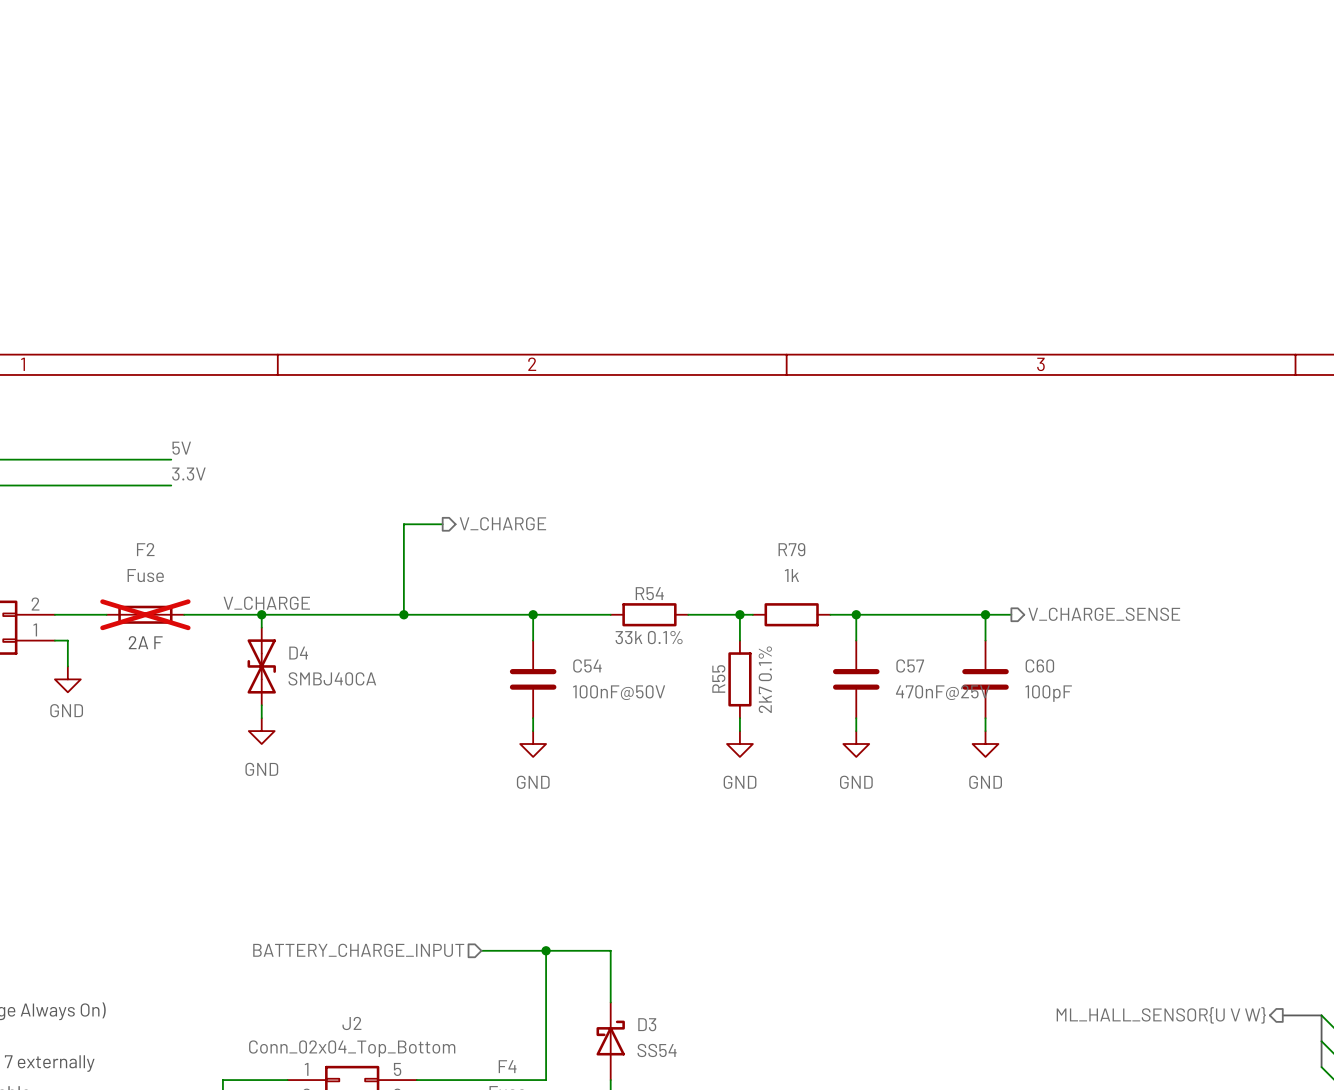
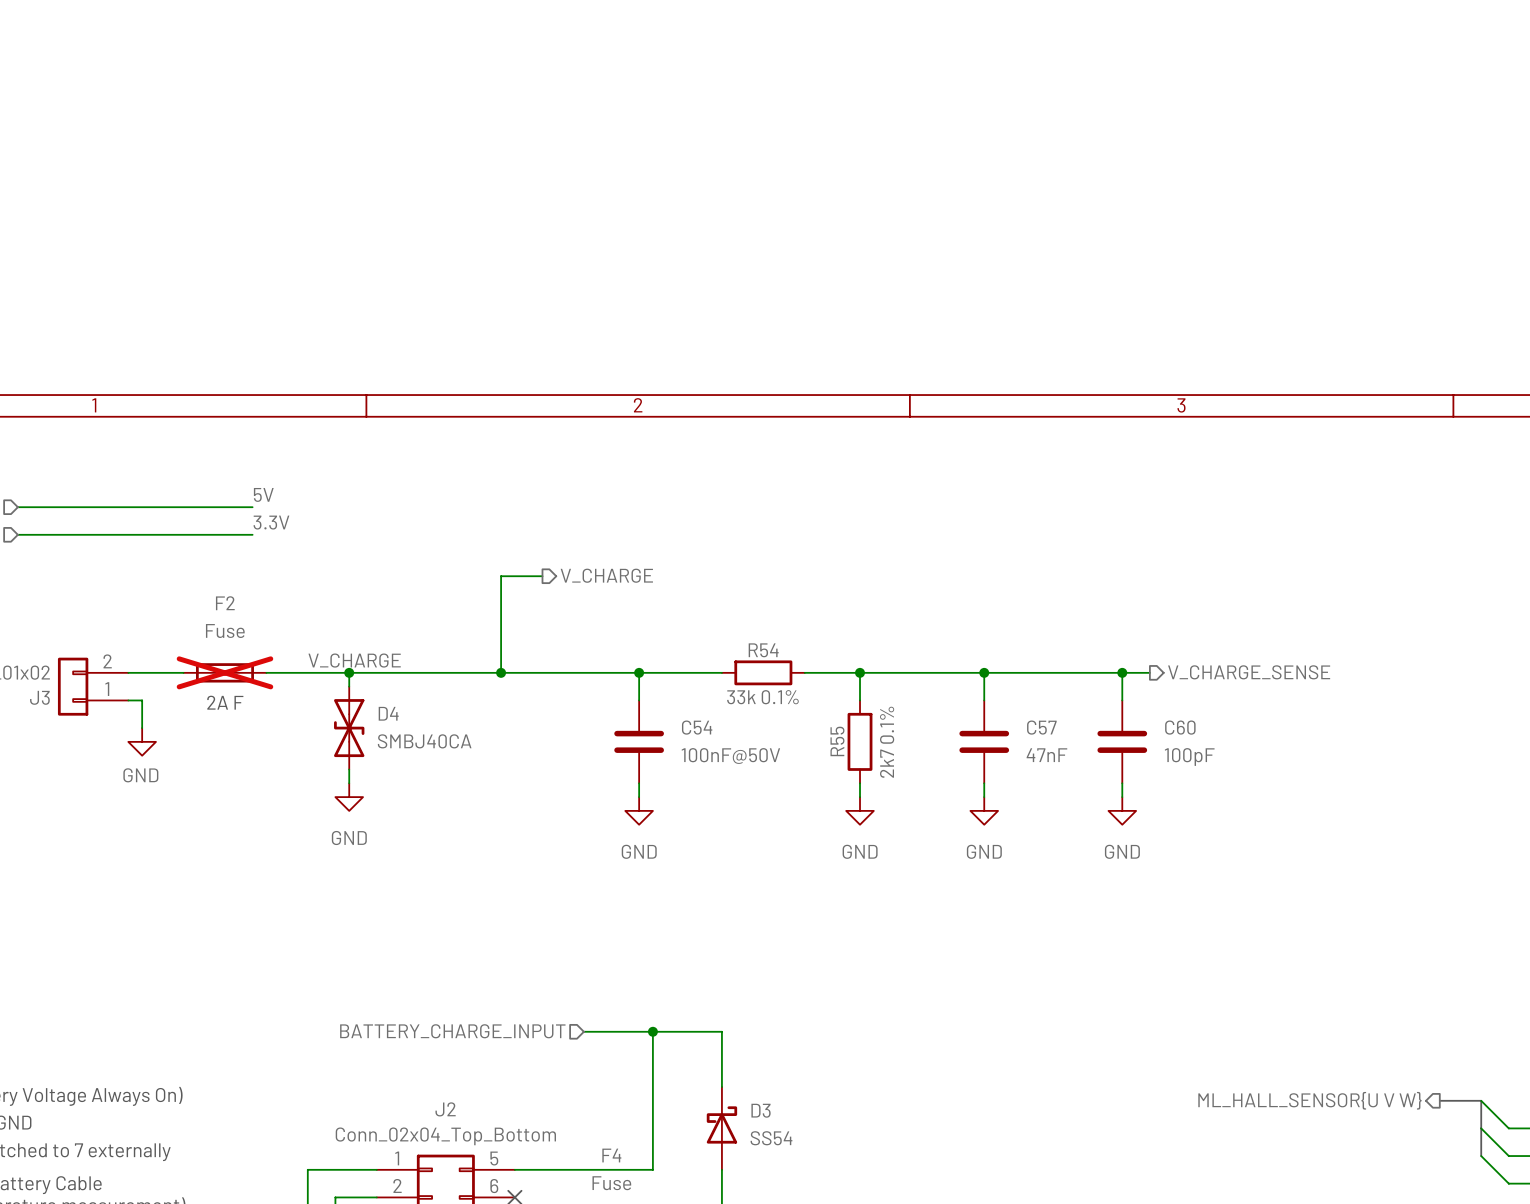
wire: none -> (873, 672) (956, 672)
R79: 1k (791, 614) -> none
C57 value: 470nF@25V (942, 692) -> 47nF (1046, 755)

